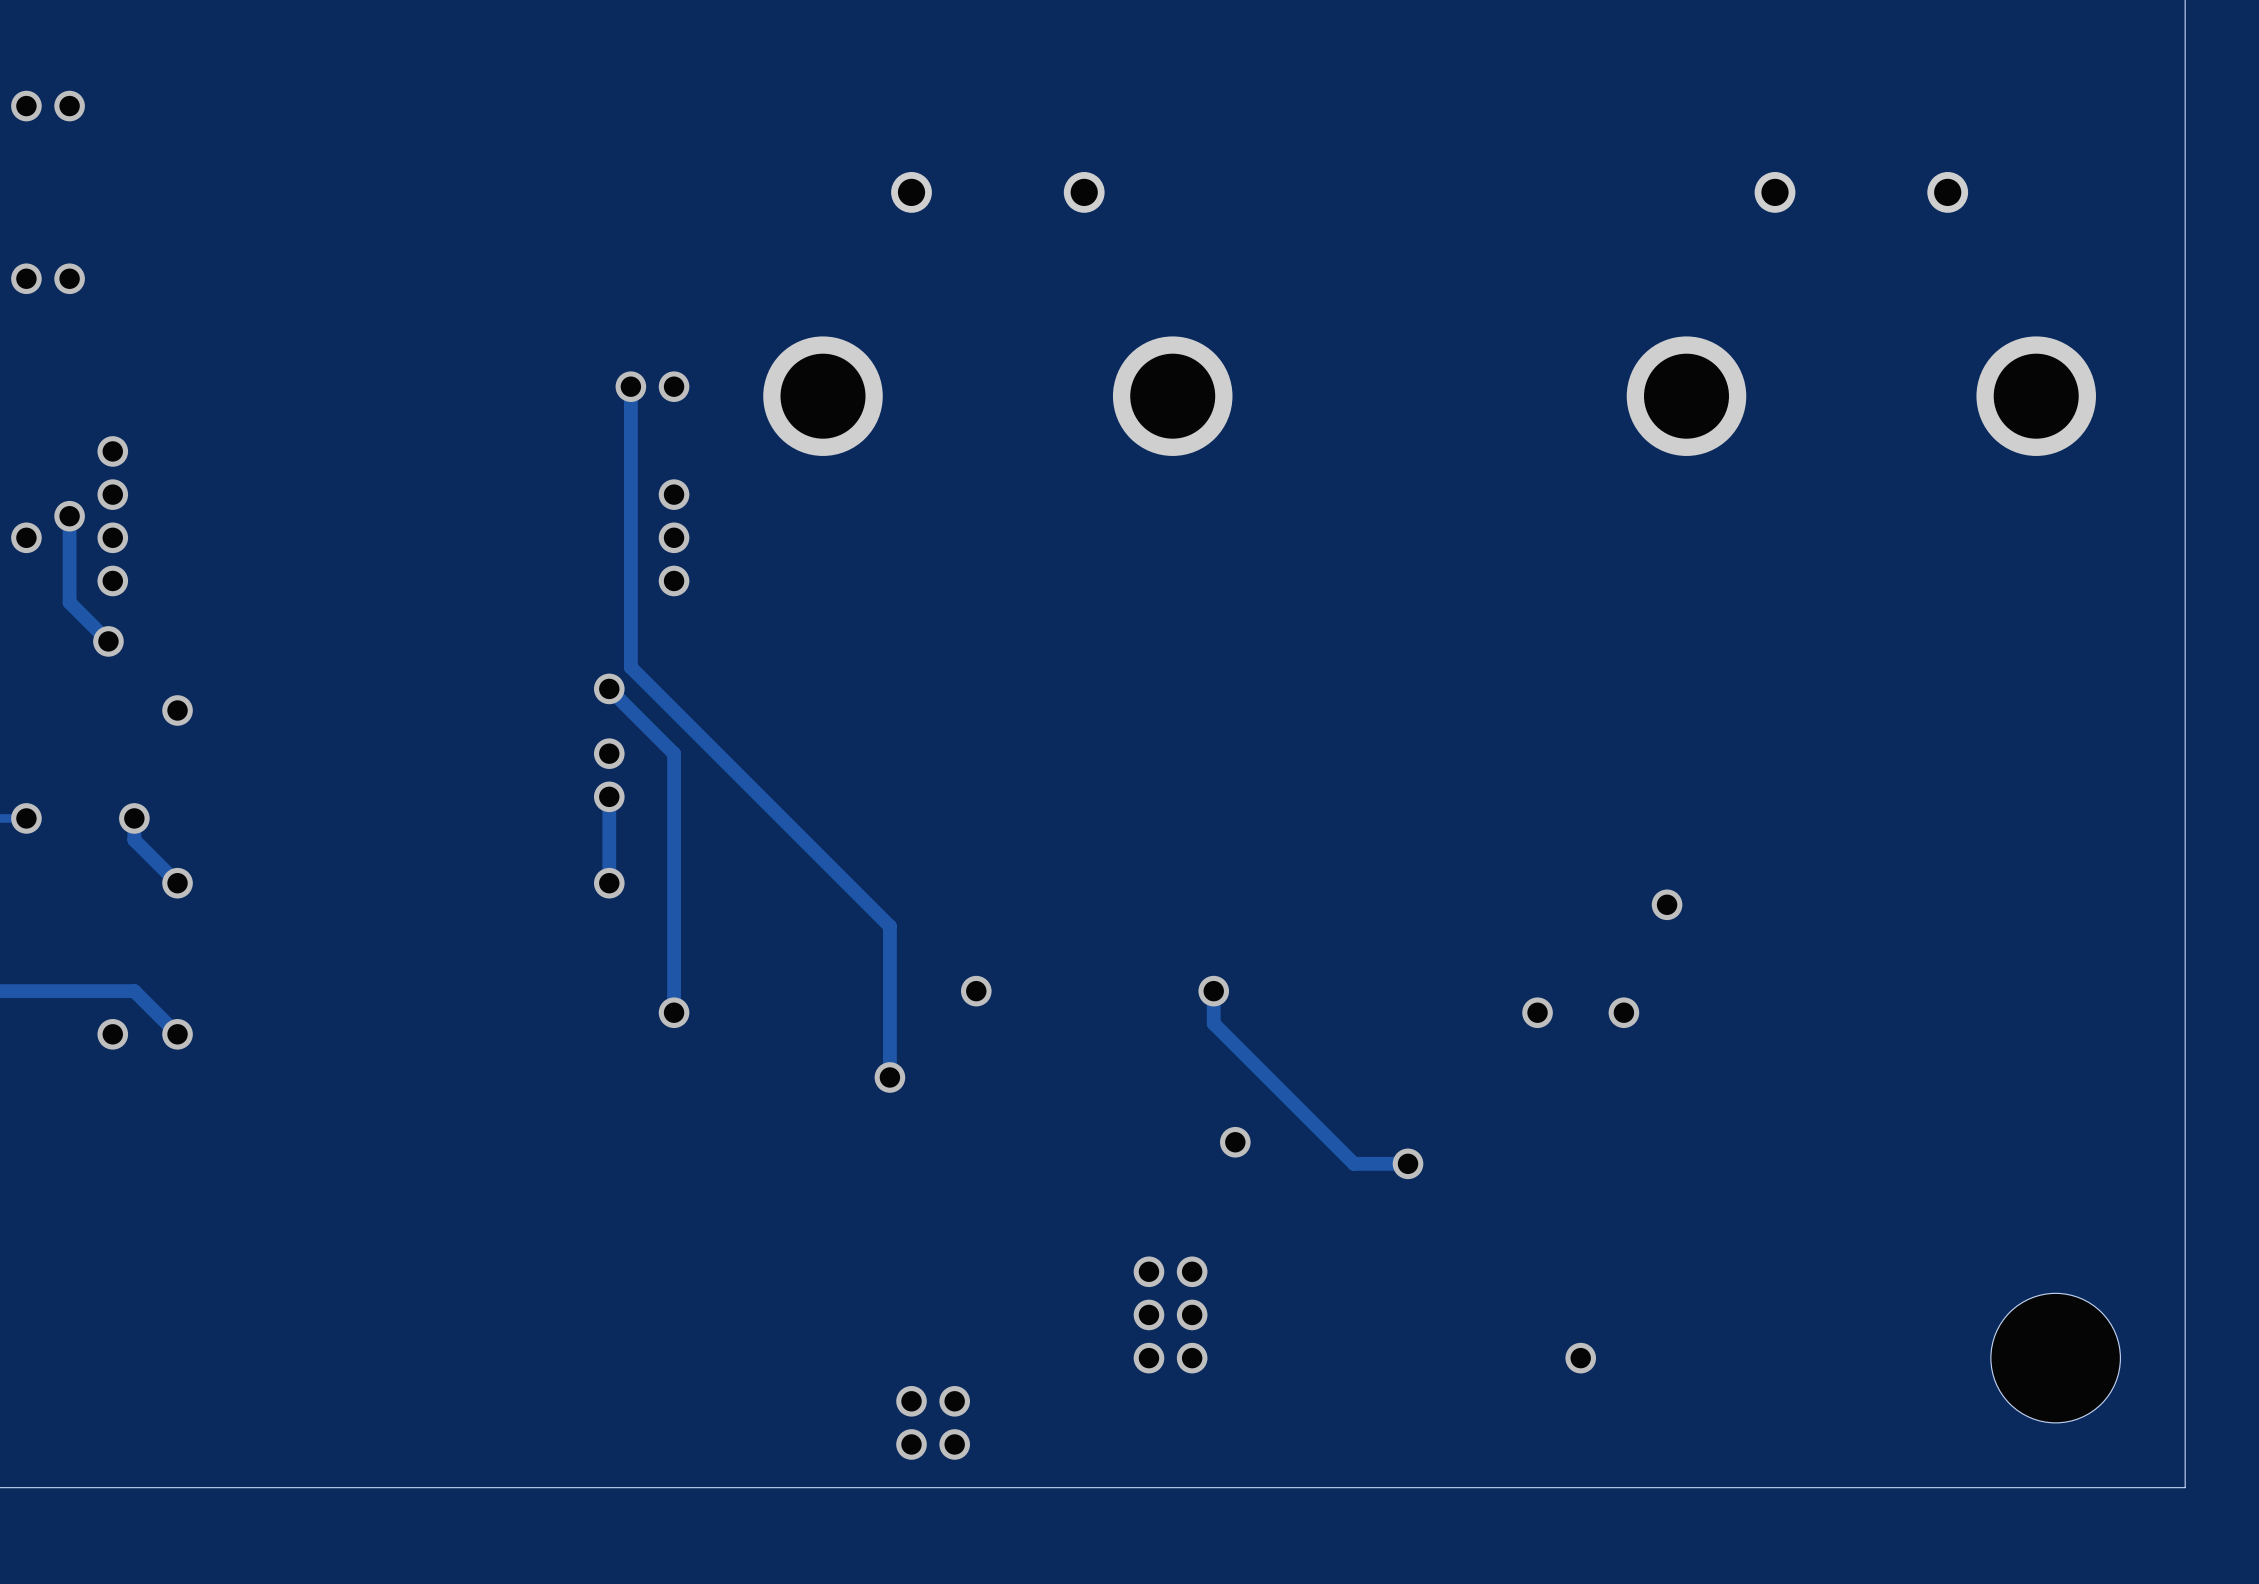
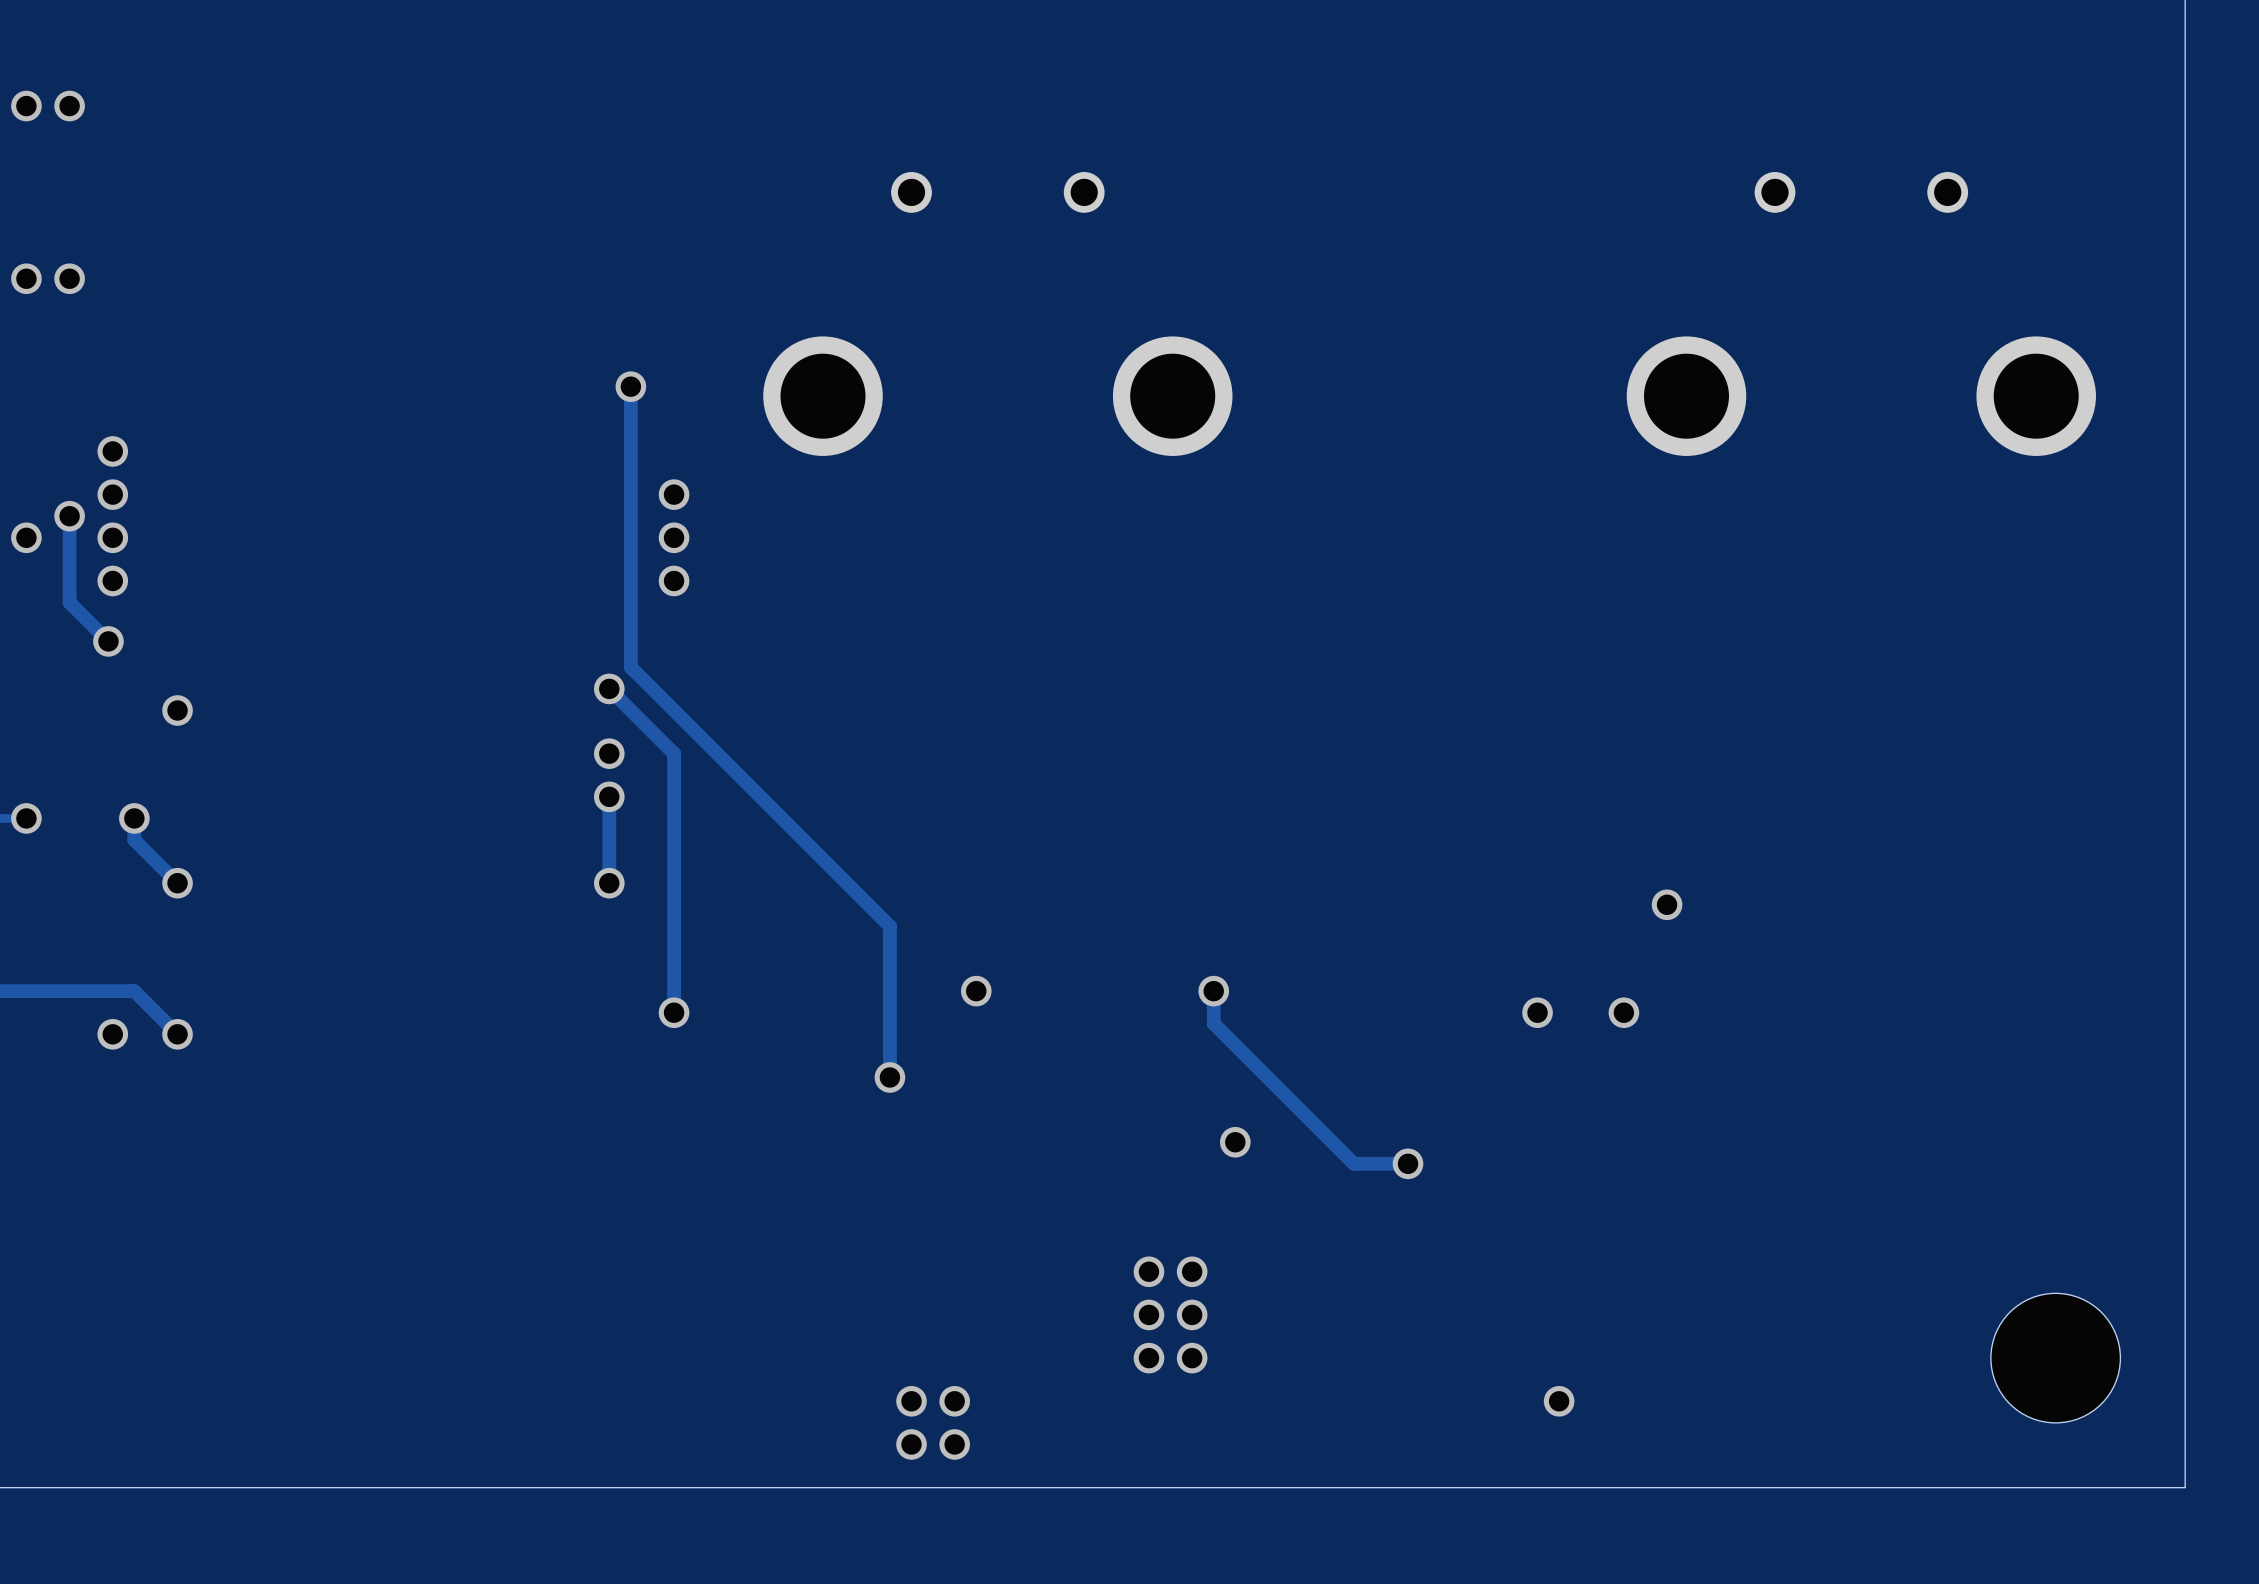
via: (674, 386) -> none
via position: (1580, 1358) -> (1559, 1401)

